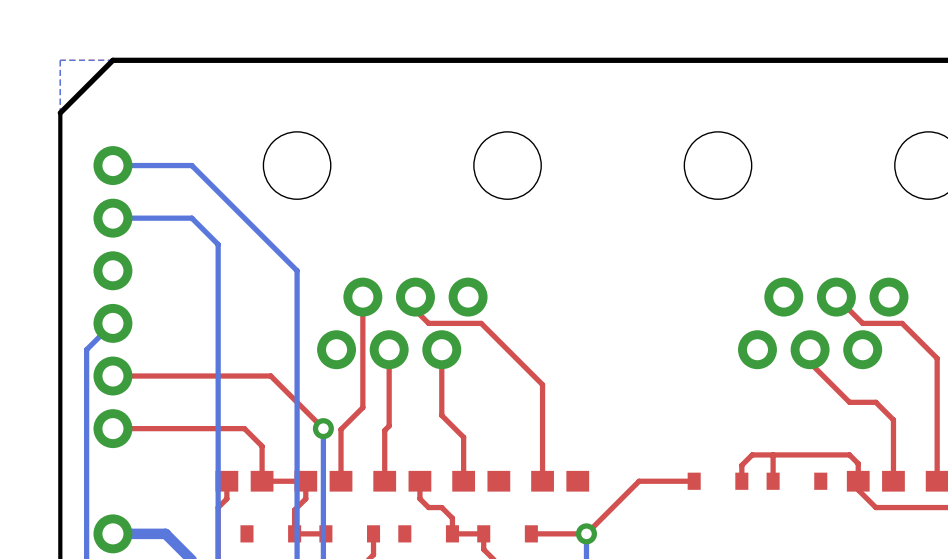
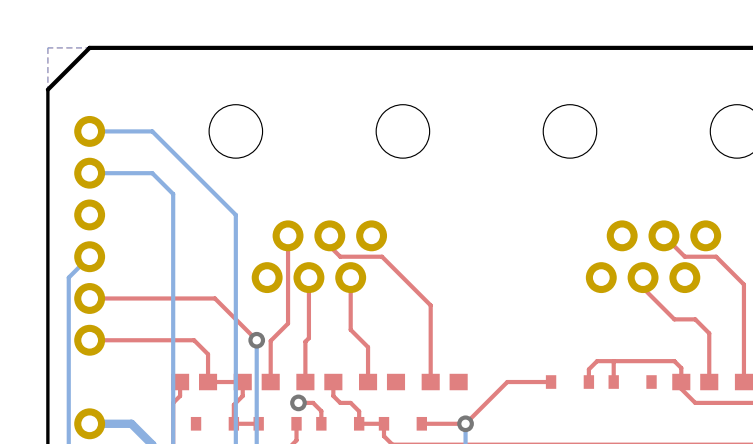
top track: none -> (298, 402) (313, 402) (321, 411) (321, 423)
via: none -> (298, 402)

